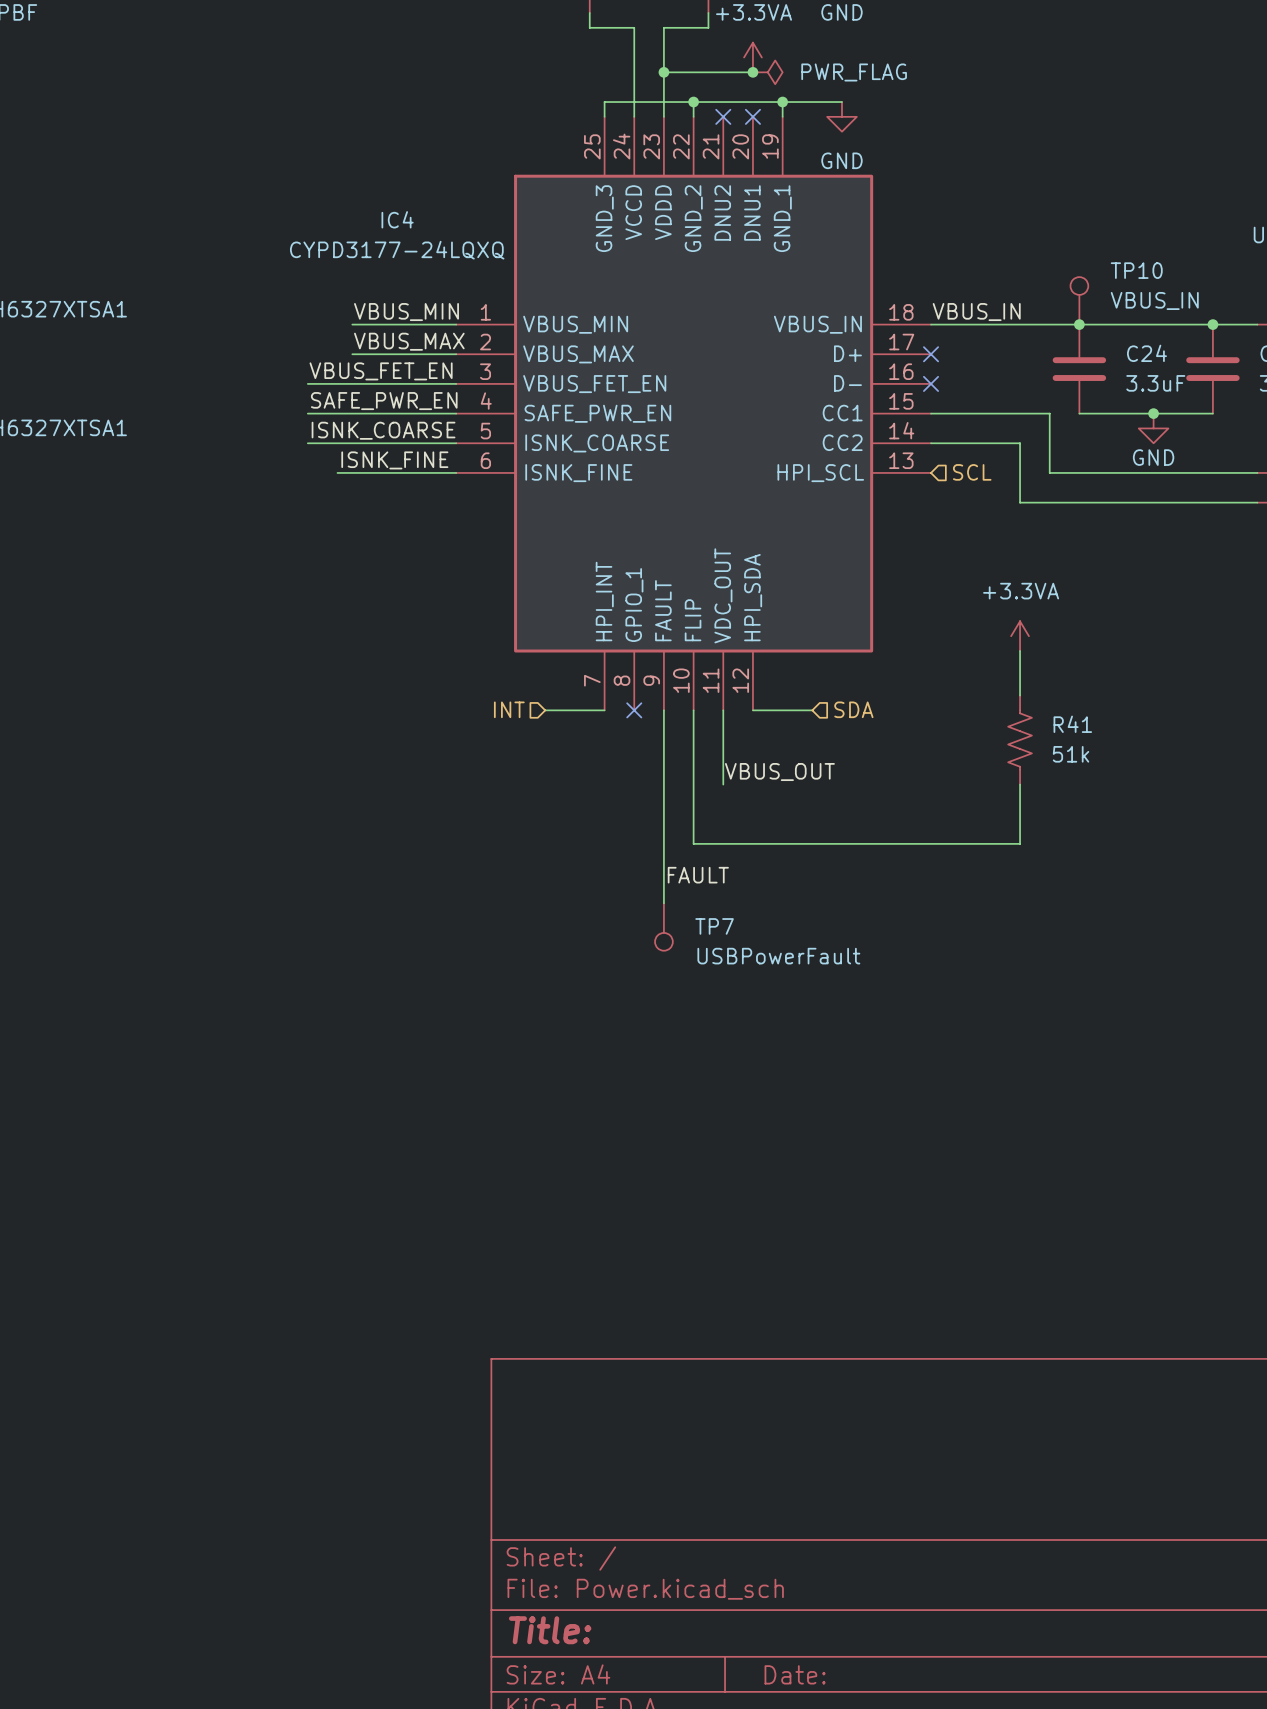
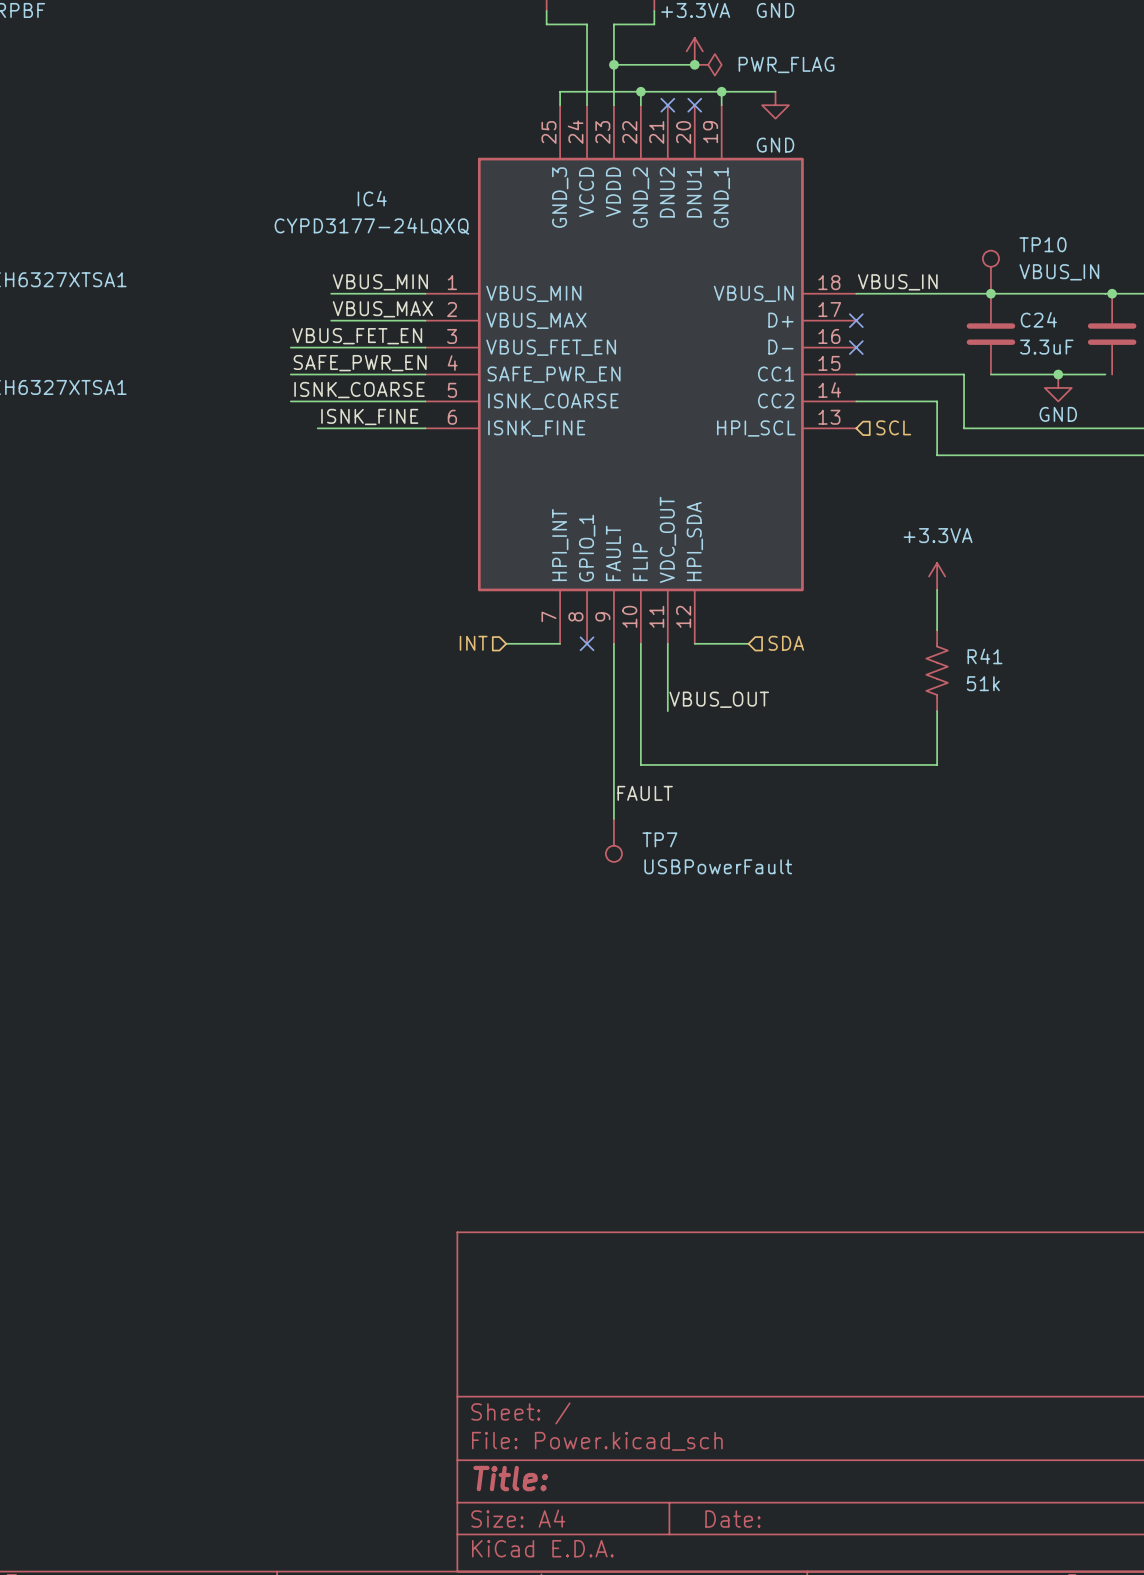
C24 name position: C24 (1146, 353) -> C24 (1038, 319)
C24 value position: 3.3uF (1155, 383) -> 3.3uF (1046, 347)
wire: (1205, 413) (1212, 413) -> none

